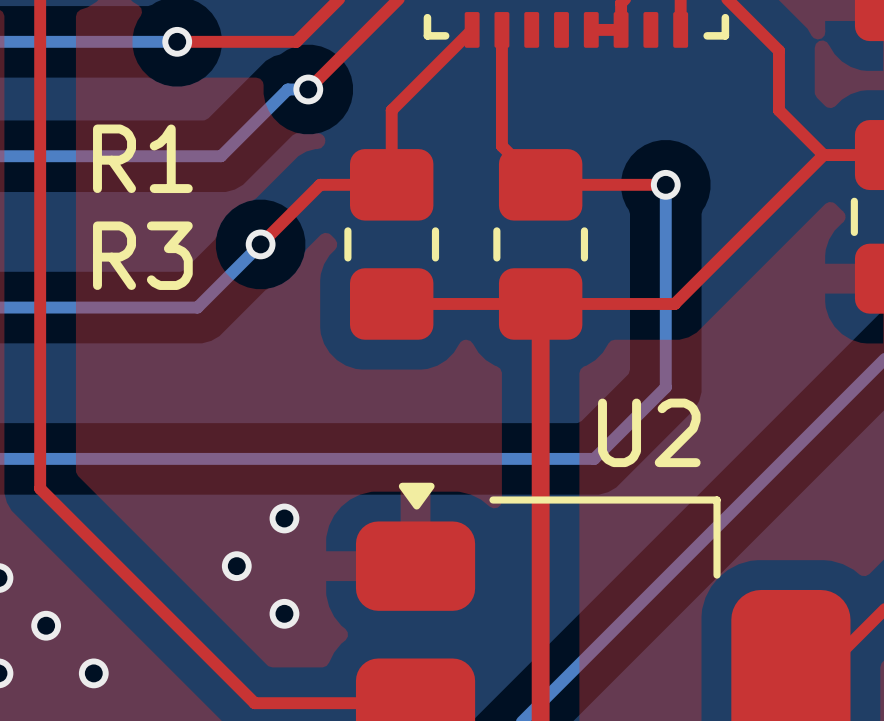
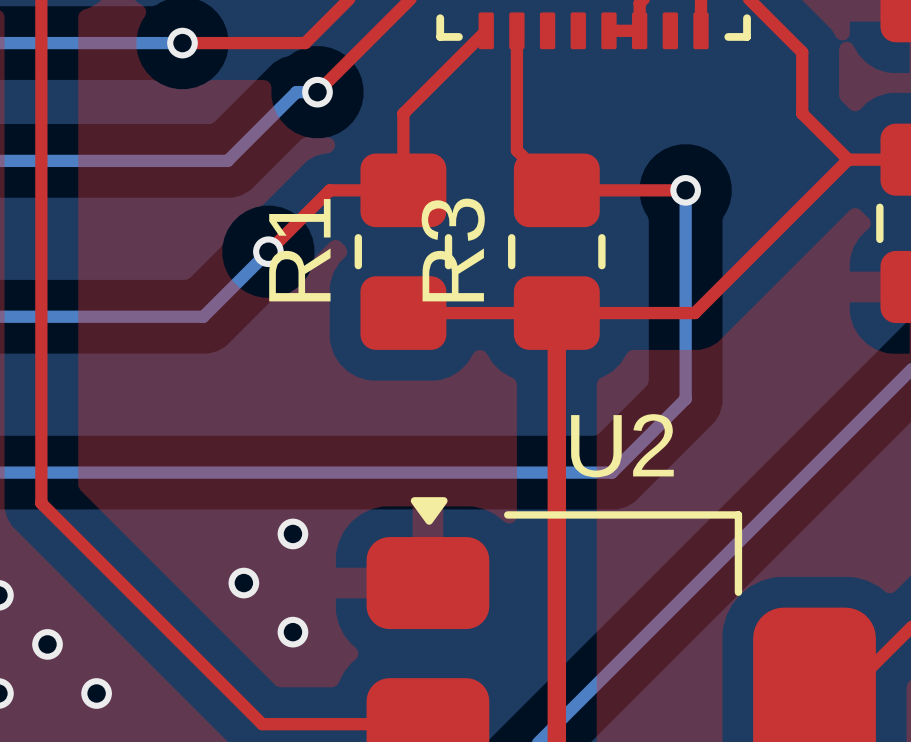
R1 name rotation: 0° (142, 158) -> 90° counterclockwise (299, 250)
R1 name position: R1 (142, 158) -> R1 (299, 250)
R3 name rotation: 0° (142, 255) -> 90° counterclockwise (453, 250)
R3 name position: R3 (142, 255) -> R3 (453, 250)
U2 name position: U2 (649, 432) -> U2 (622, 445)

